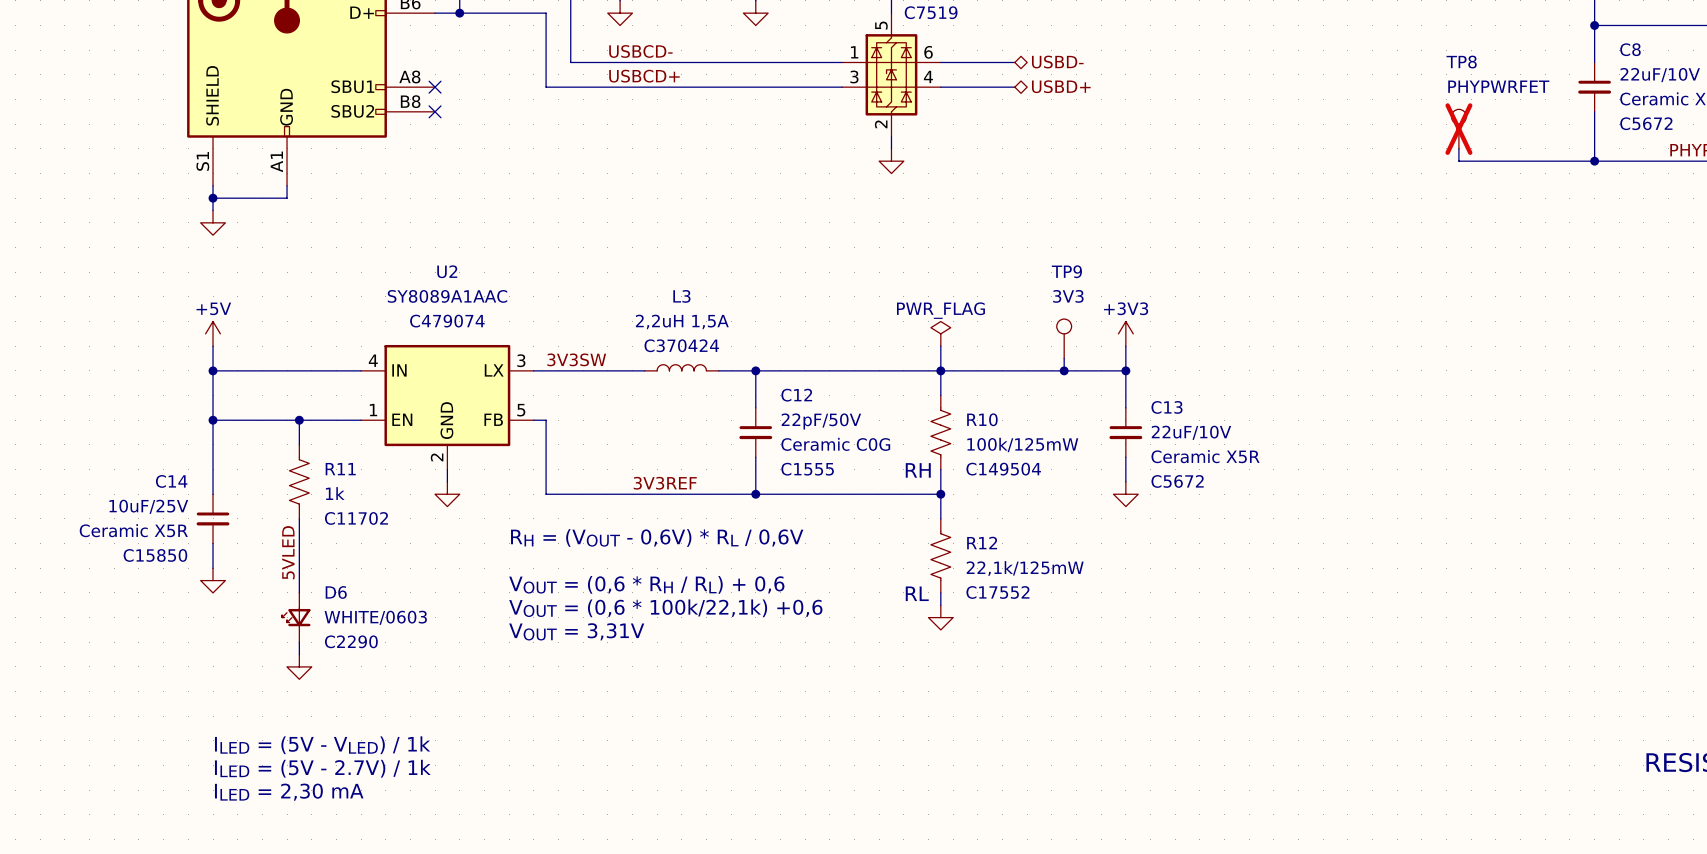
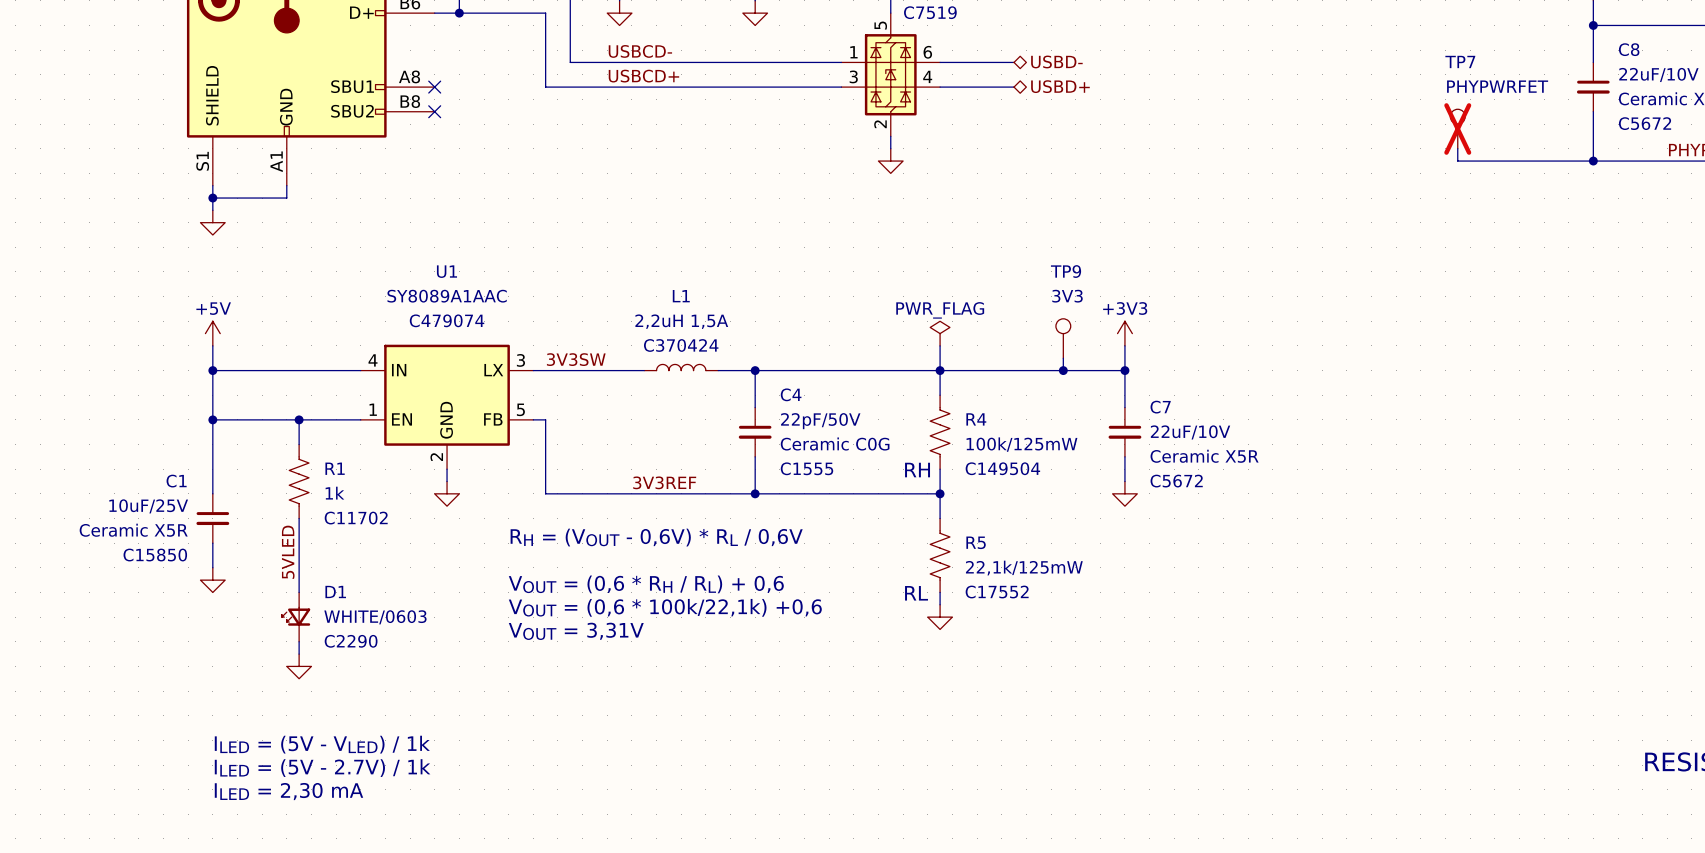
TP8 name: TP8 (1461, 62) -> TP7 (1460, 61)
U2 name: U2 (447, 271) -> U1 (446, 271)
L3 name: L3 (681, 296) -> L1 (681, 296)
C12 name: C12 (796, 395) -> C4 (791, 394)
C13 name: C13 (1167, 407) -> C7 (1160, 407)
R10 name: R10 (982, 419) -> R4 (976, 419)
R11 name: R11 (340, 469) -> R1 (335, 468)
C14 name: C14 (171, 481) -> C1 (176, 481)
R12 name: R12 (982, 543) -> R5 (976, 542)
D6 name: D6 (336, 592) -> D1 (335, 591)

